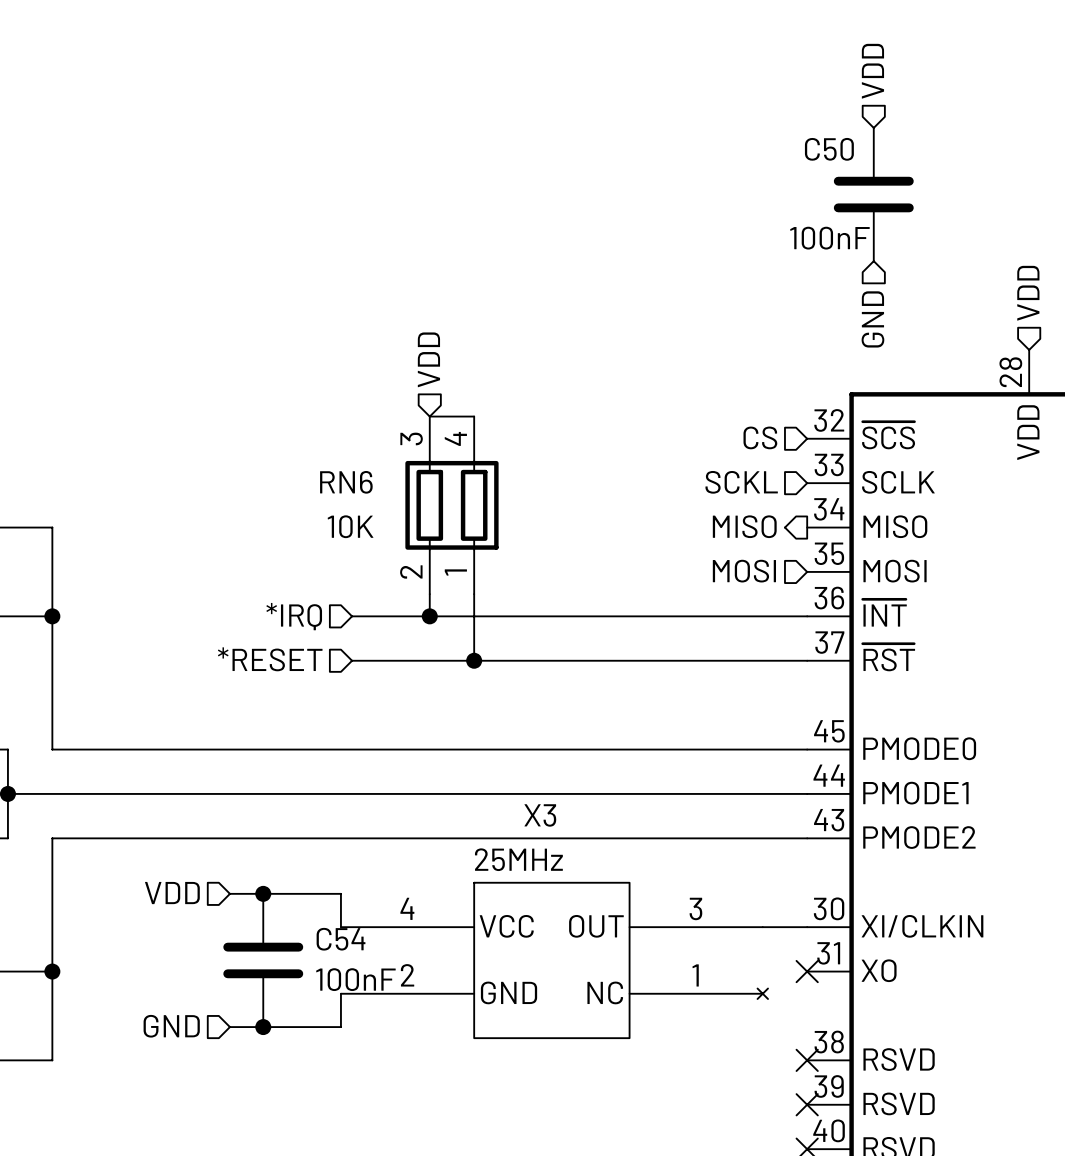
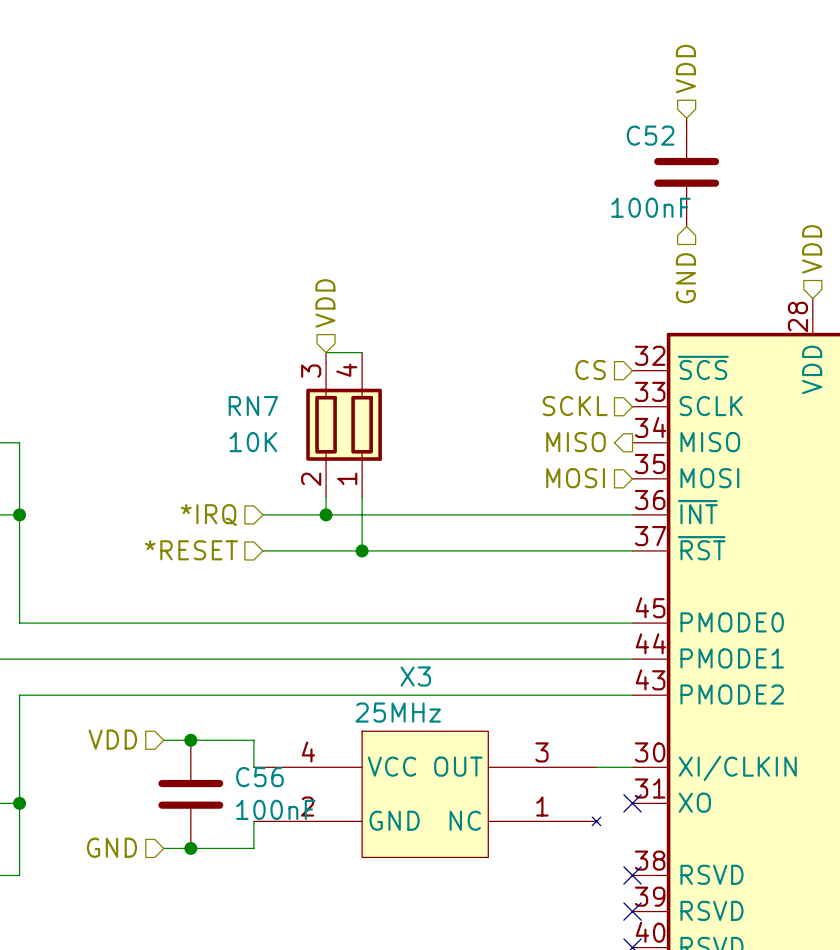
C50 name: C50 (829, 149) -> C52 (650, 135)
RN6 name: RN6 (346, 482) -> RN7 (253, 406)
C54 name: C54 (341, 939) -> C56 (259, 777)

